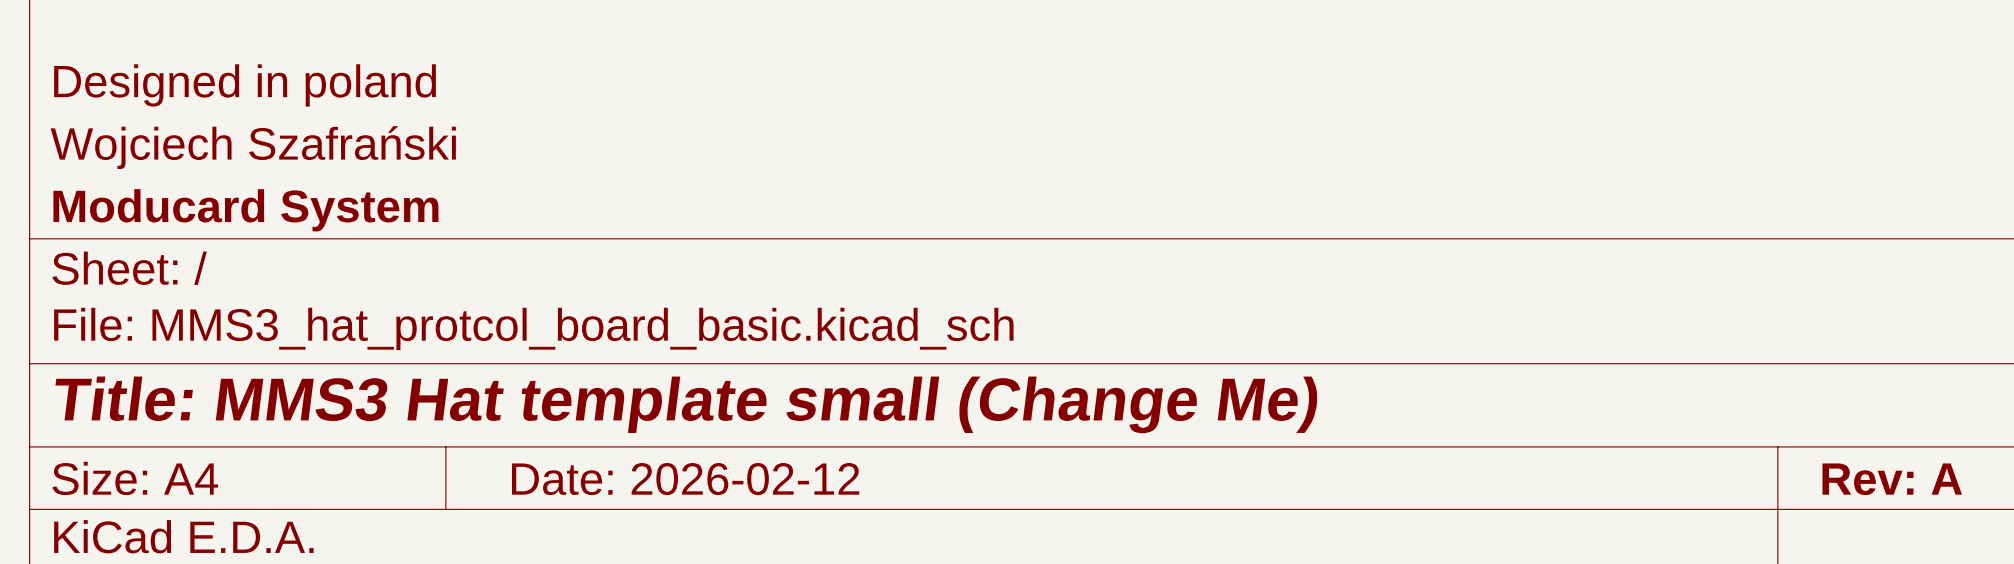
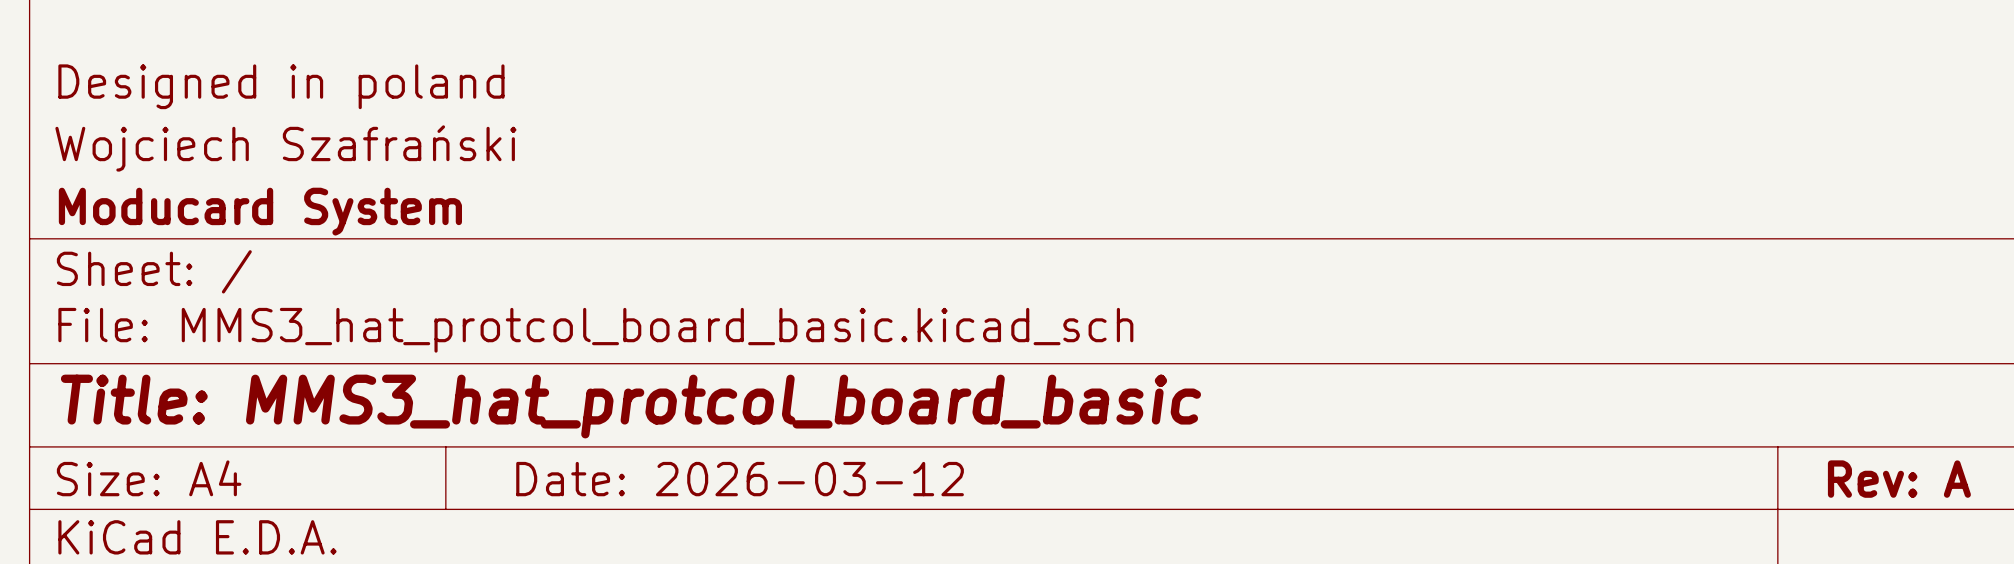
title block: Title: MMS3 Hat template small (Change Me) (686, 404) -> Title: MMS3_hat_protcol_board_basic (630, 406)
title block: Date: 2026-02-12 (685, 479) -> Date: 2026-03-12 (740, 479)

